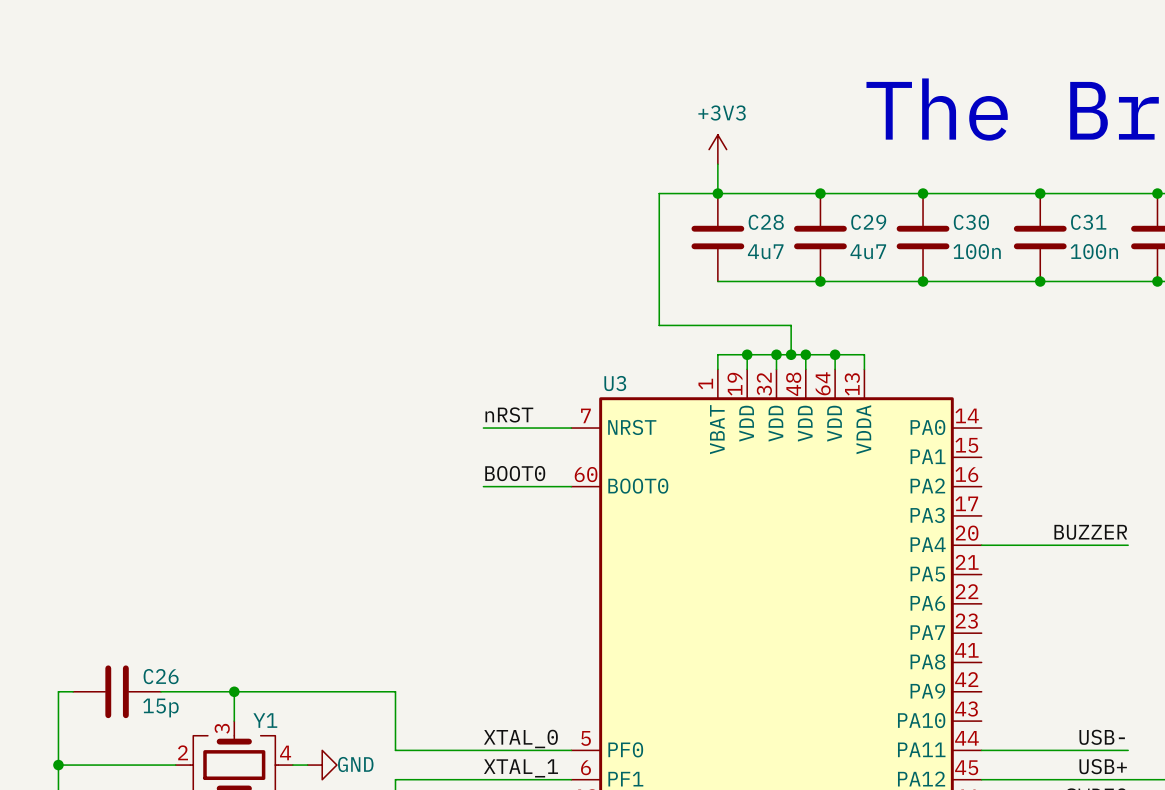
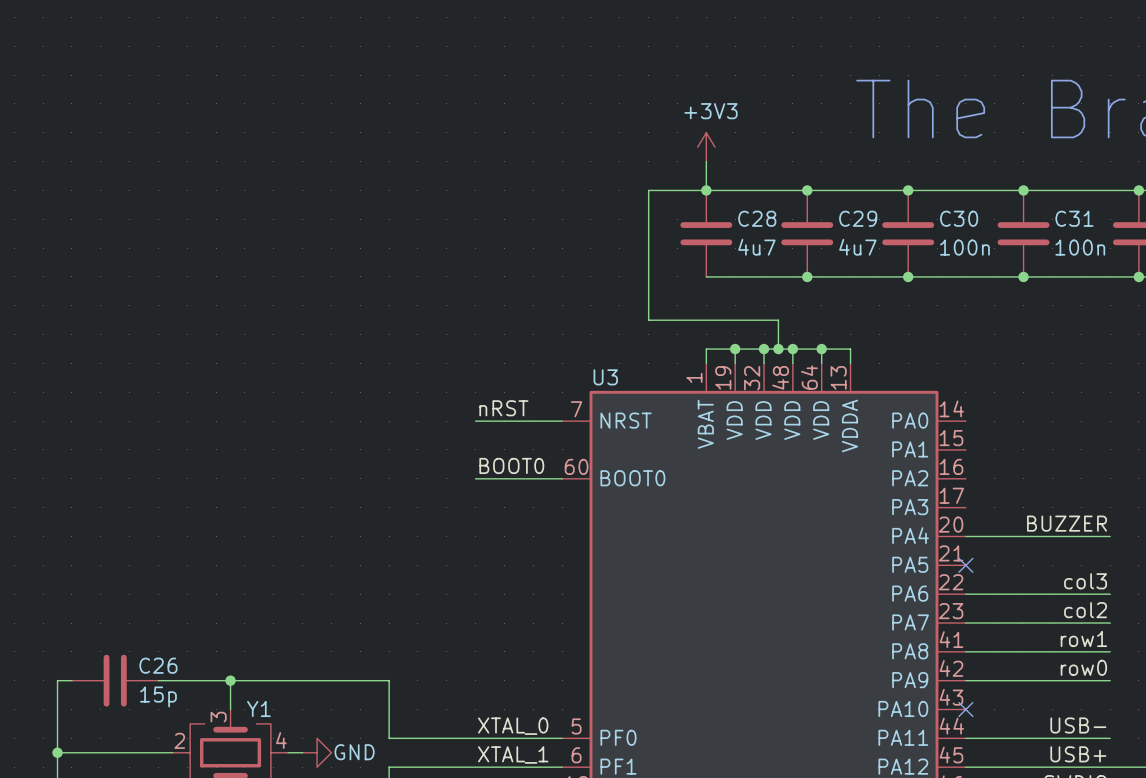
no-connect mark: none -> (965, 565)
label: none -> col3 (1085, 581)
wire: none -> (965, 594) (1110, 594)
label: none -> col2 (1085, 610)
wire: none -> (965, 623) (1110, 623)
label: none -> row1 (1083, 638)
wire: none -> (965, 651) (1110, 651)
label: none -> row0 (1083, 667)
wire: none -> (965, 680) (1110, 680)
no-connect mark: none -> (965, 709)

